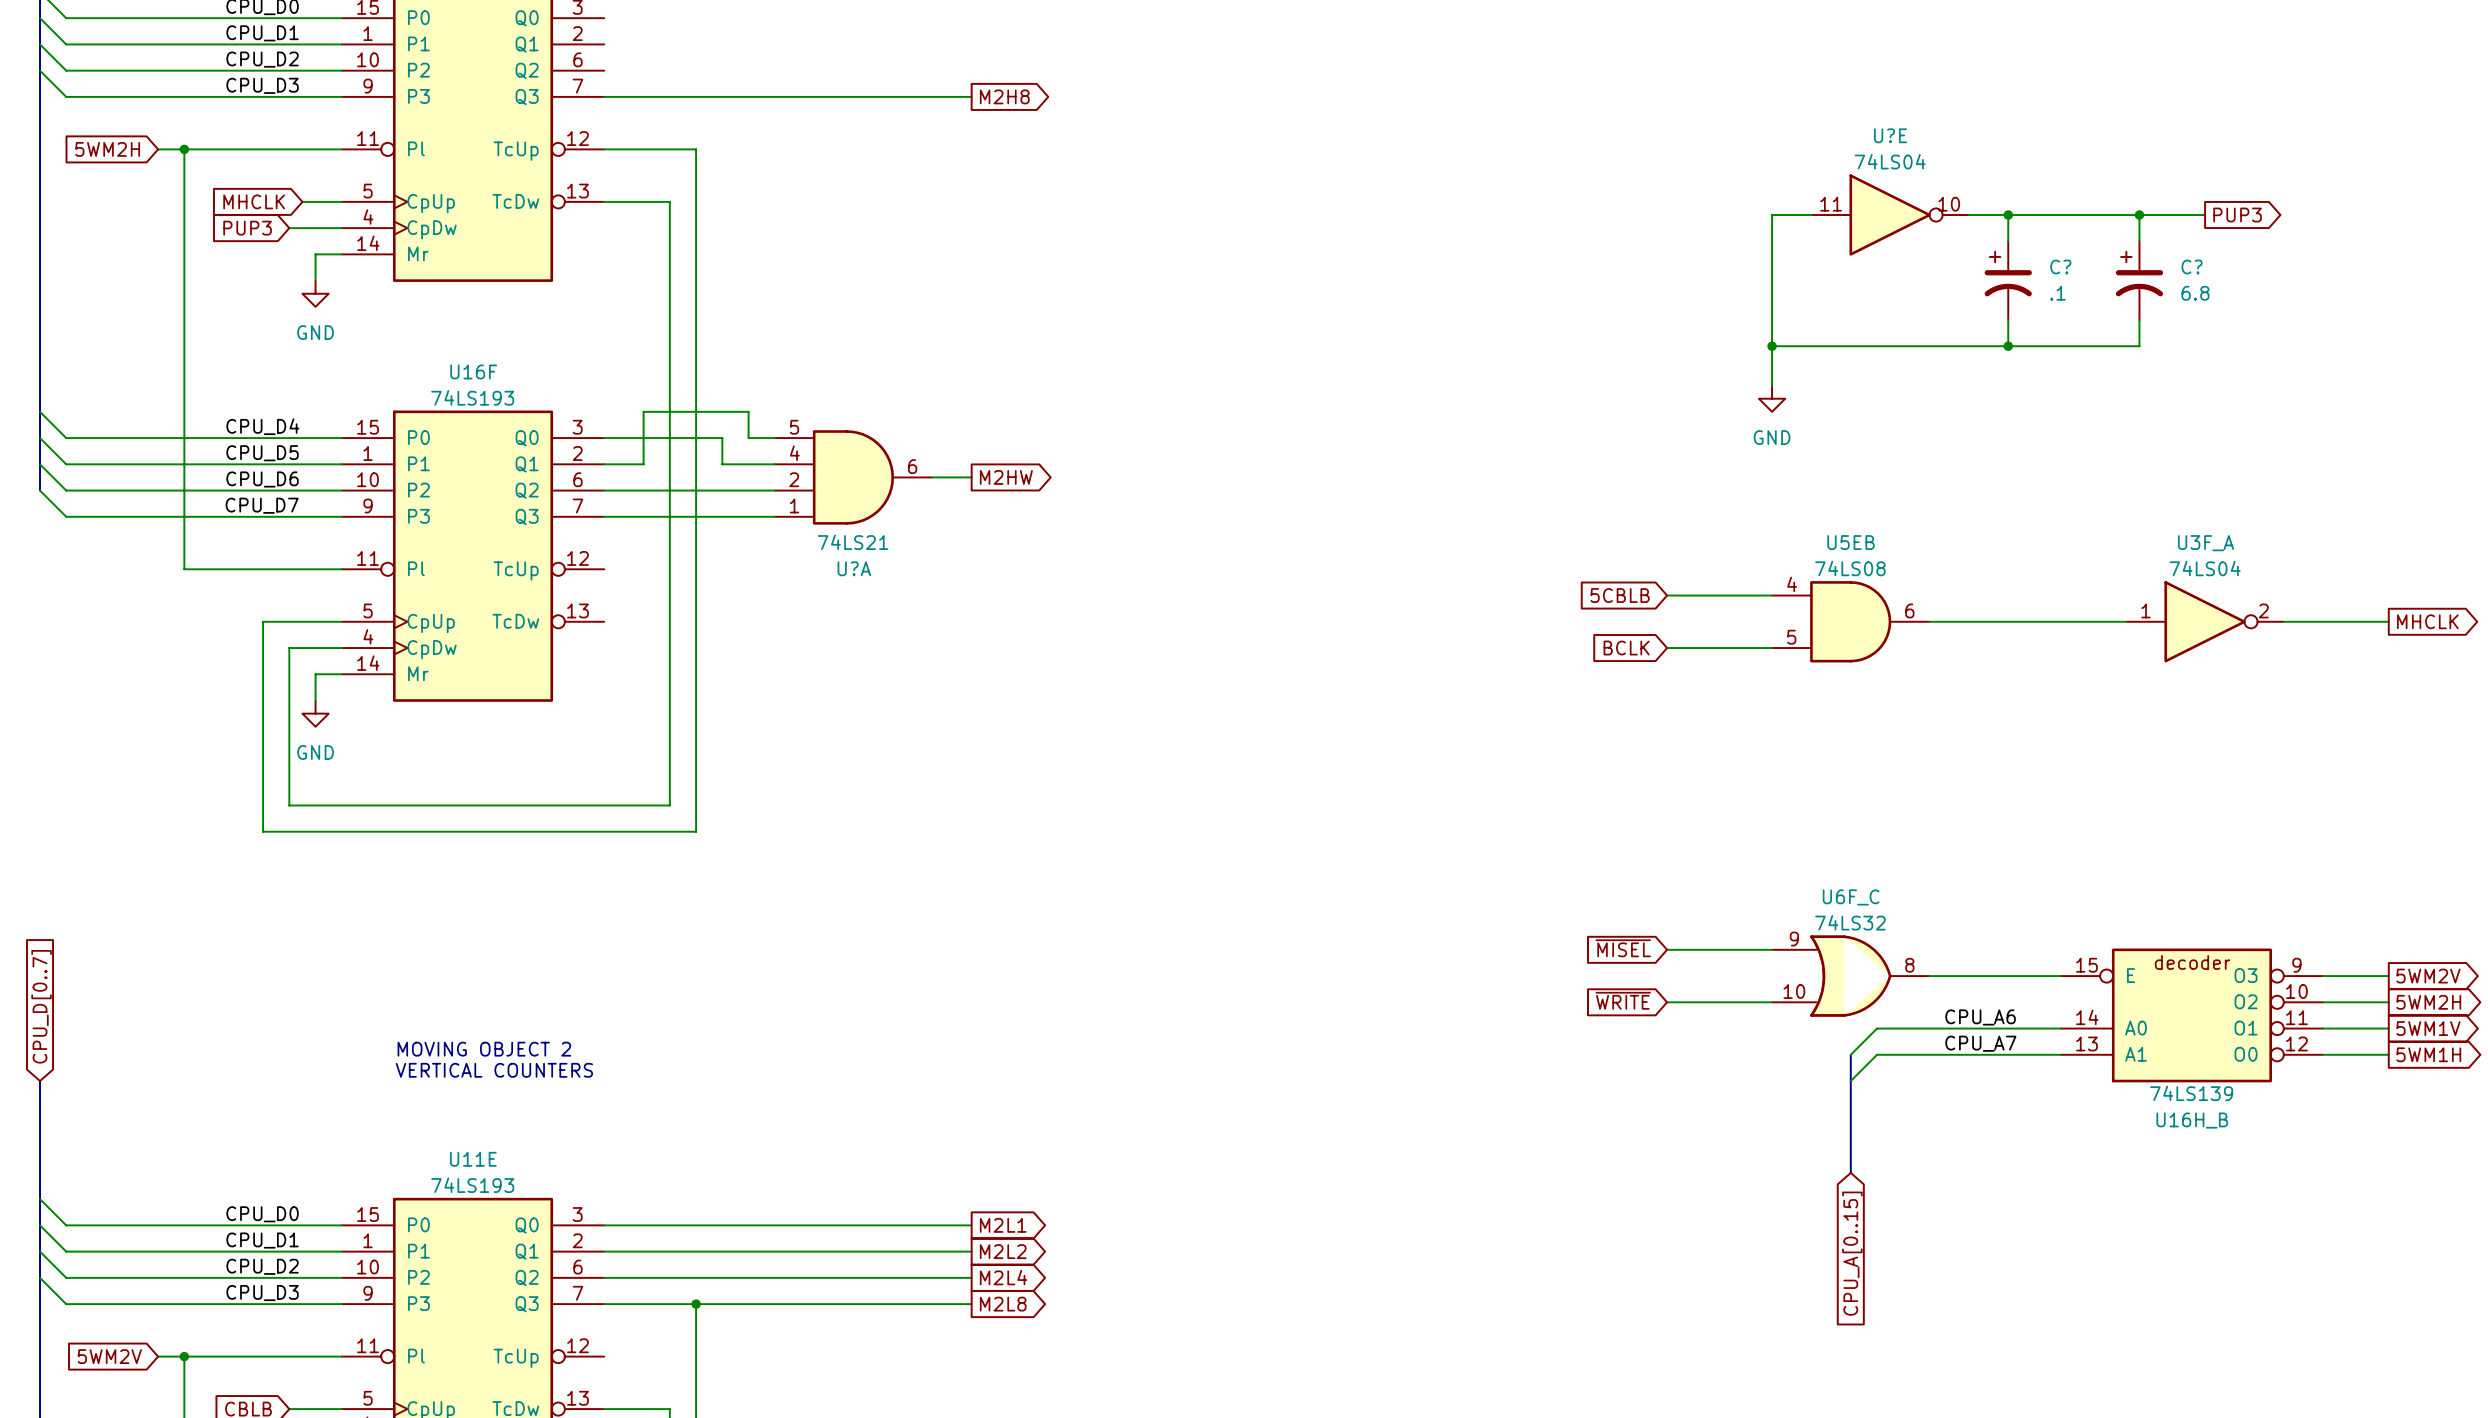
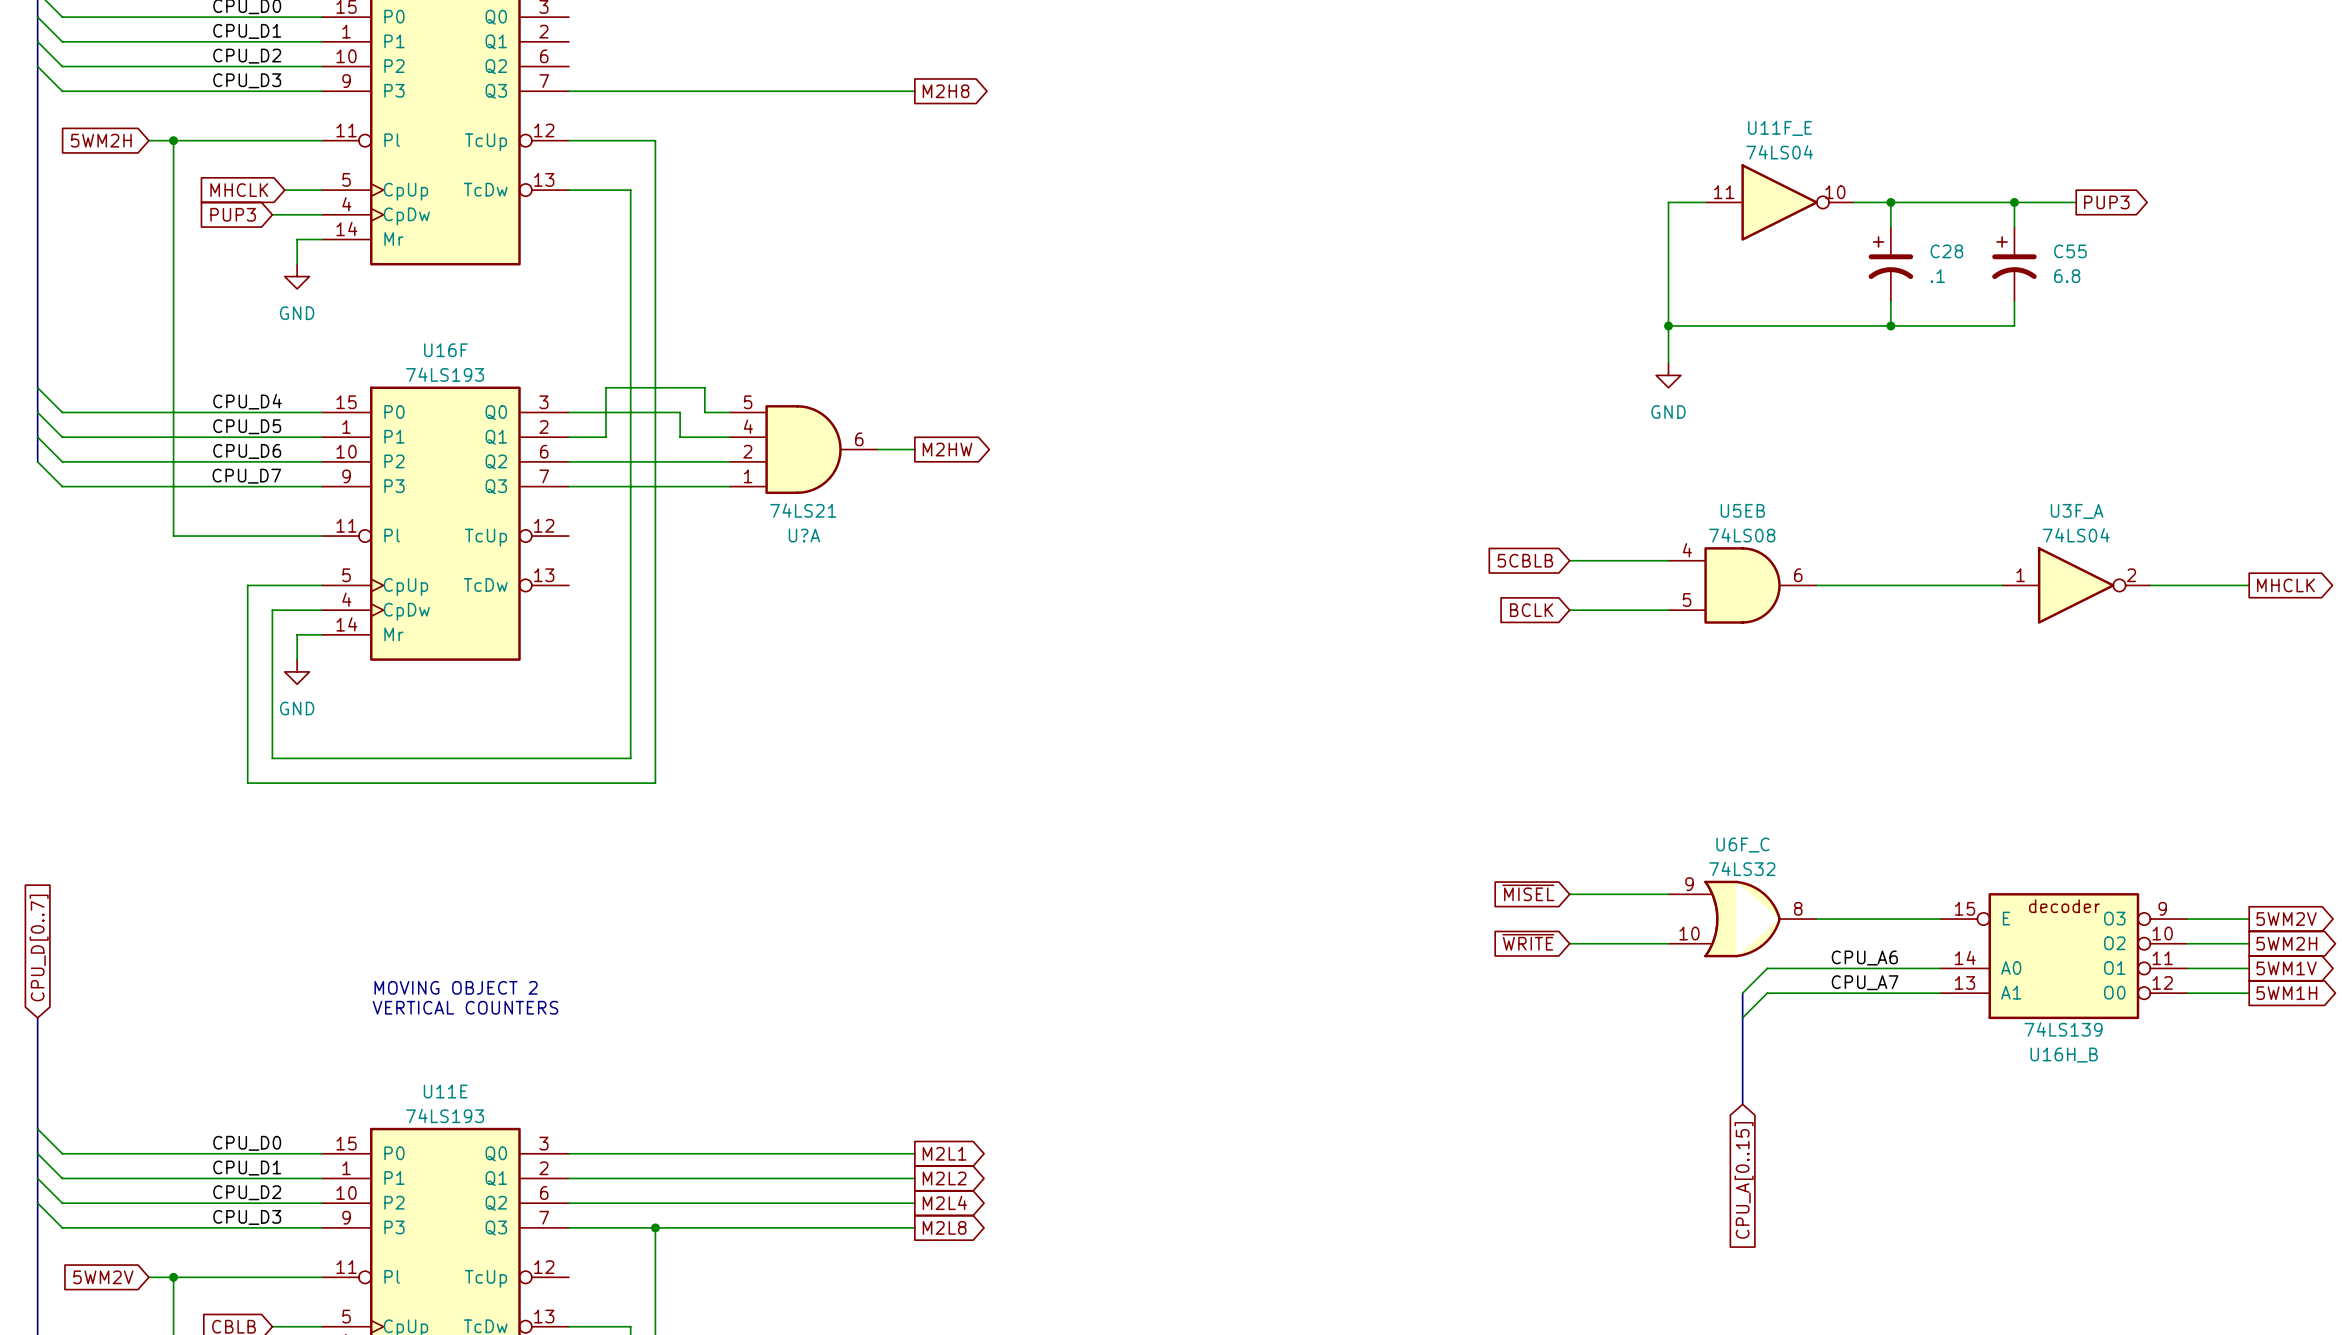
U?E name: U?E (1890, 135) -> U11F_E (1780, 128)
C? name: C? (2060, 267) -> C28 (1946, 251)
C? name: C? (2192, 267) -> C55 (2070, 251)

